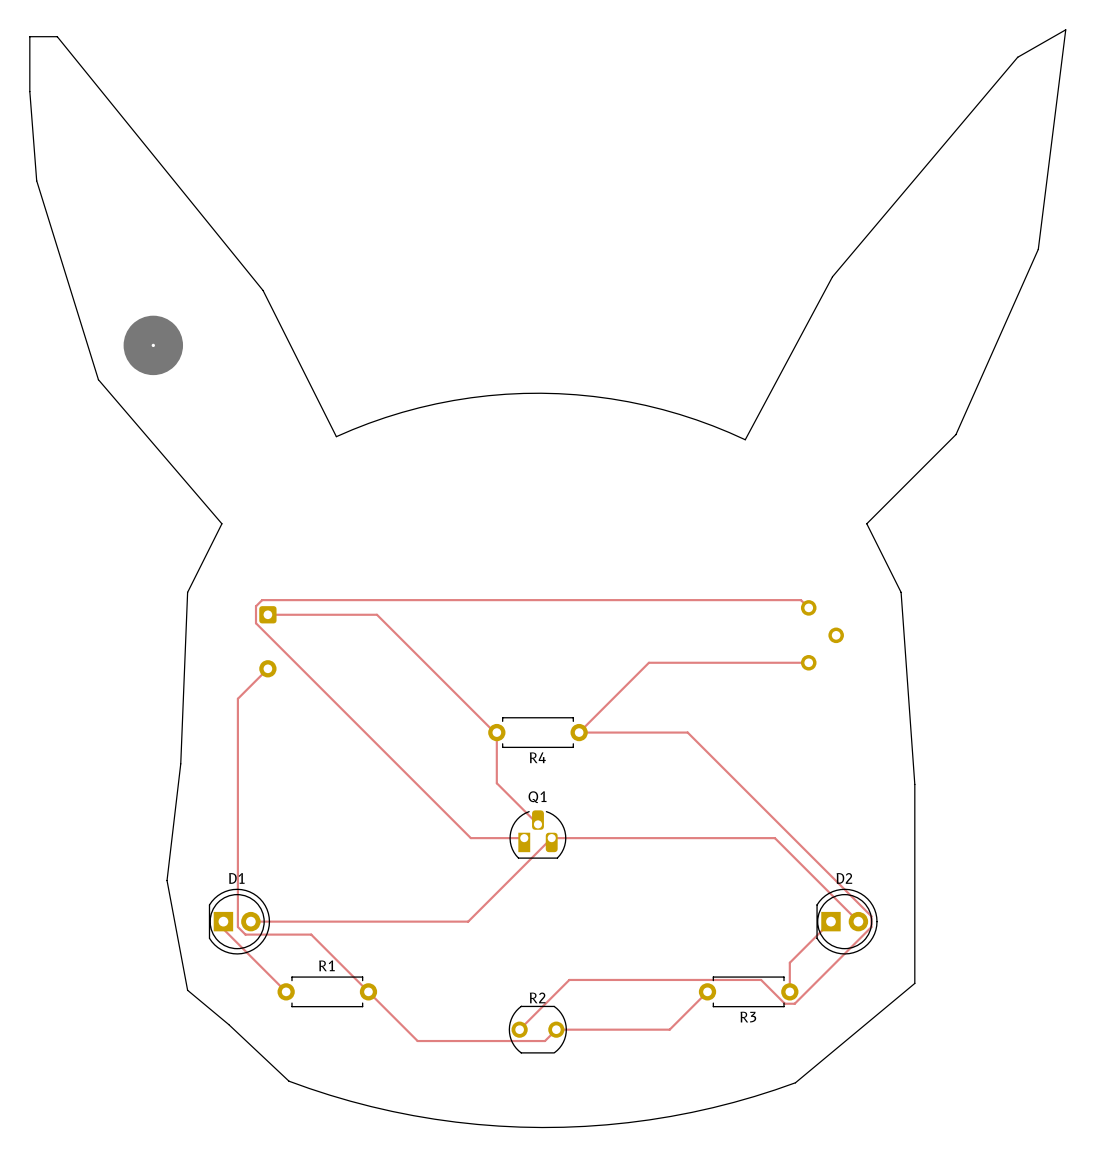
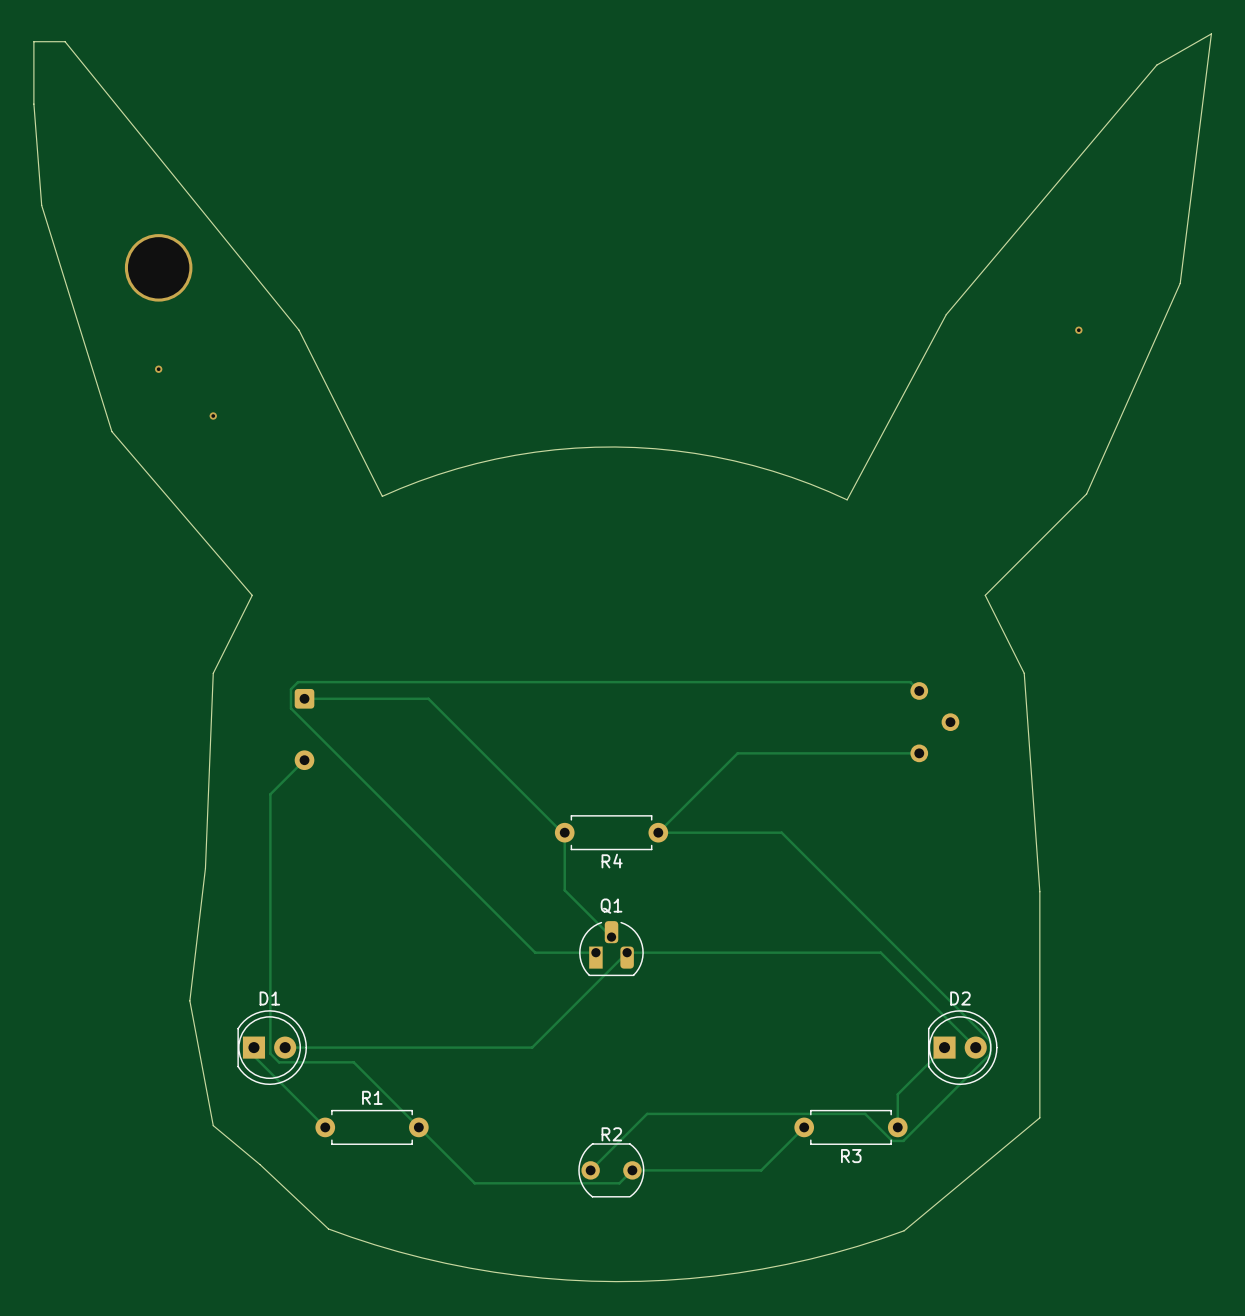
via: none -> (158, 267)
via: none -> (1078, 330)
via: none -> (158, 369)
via: (153, 345) -> none
via: none -> (213, 416)

